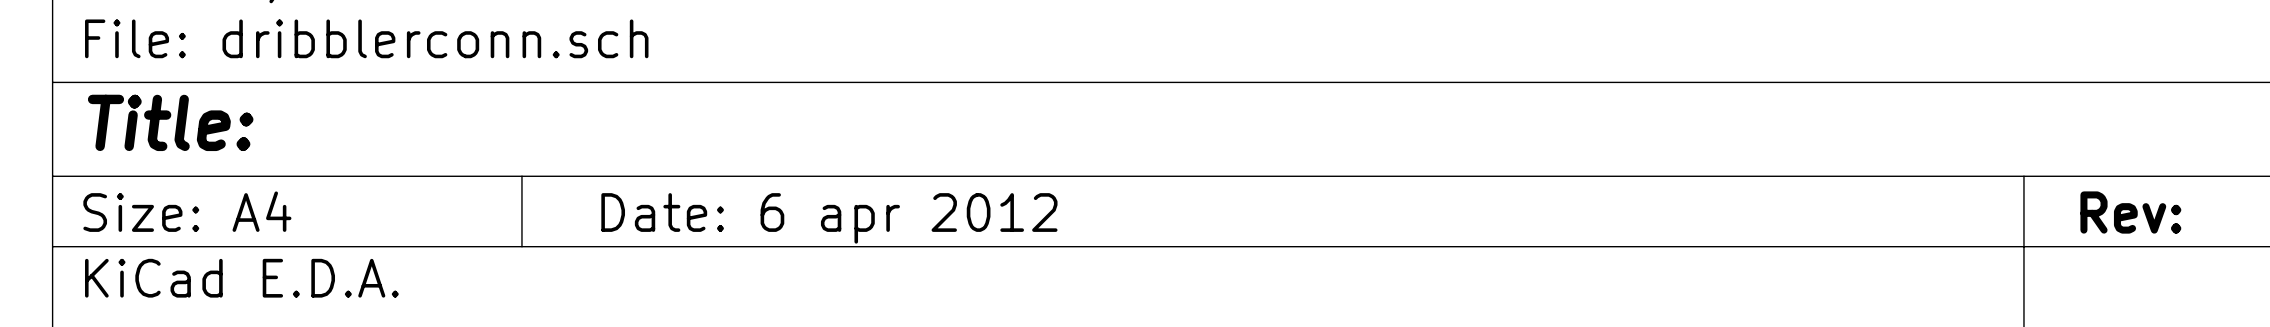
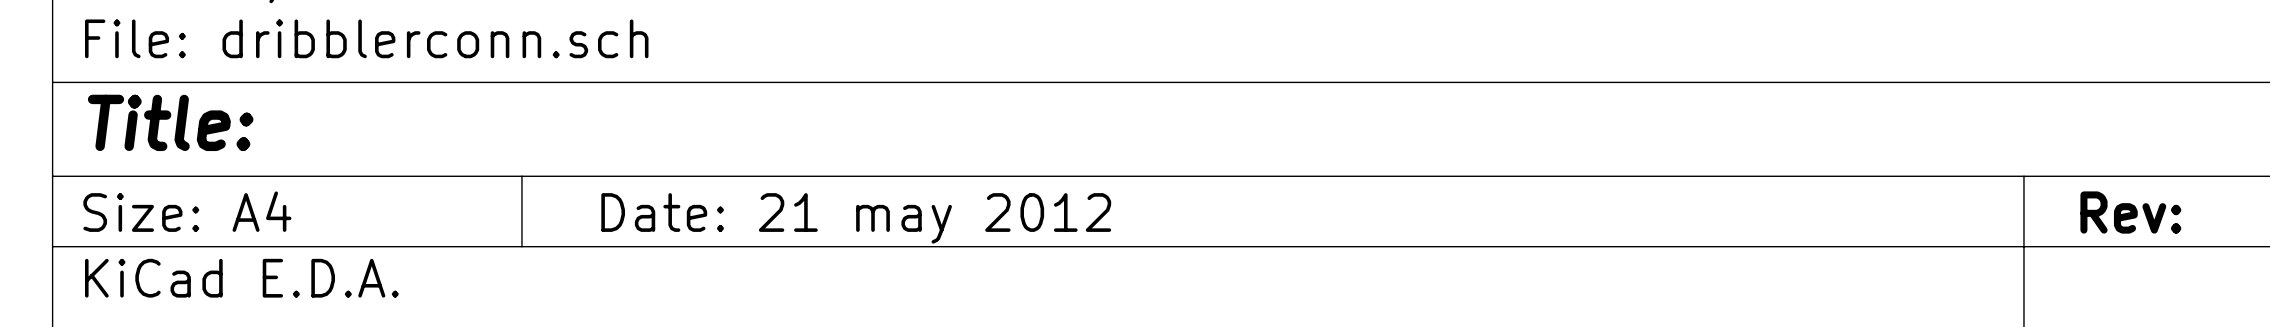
title block: Date: 6 apr 2012 (829, 218) -> Date: 21 may 2012 (856, 218)

